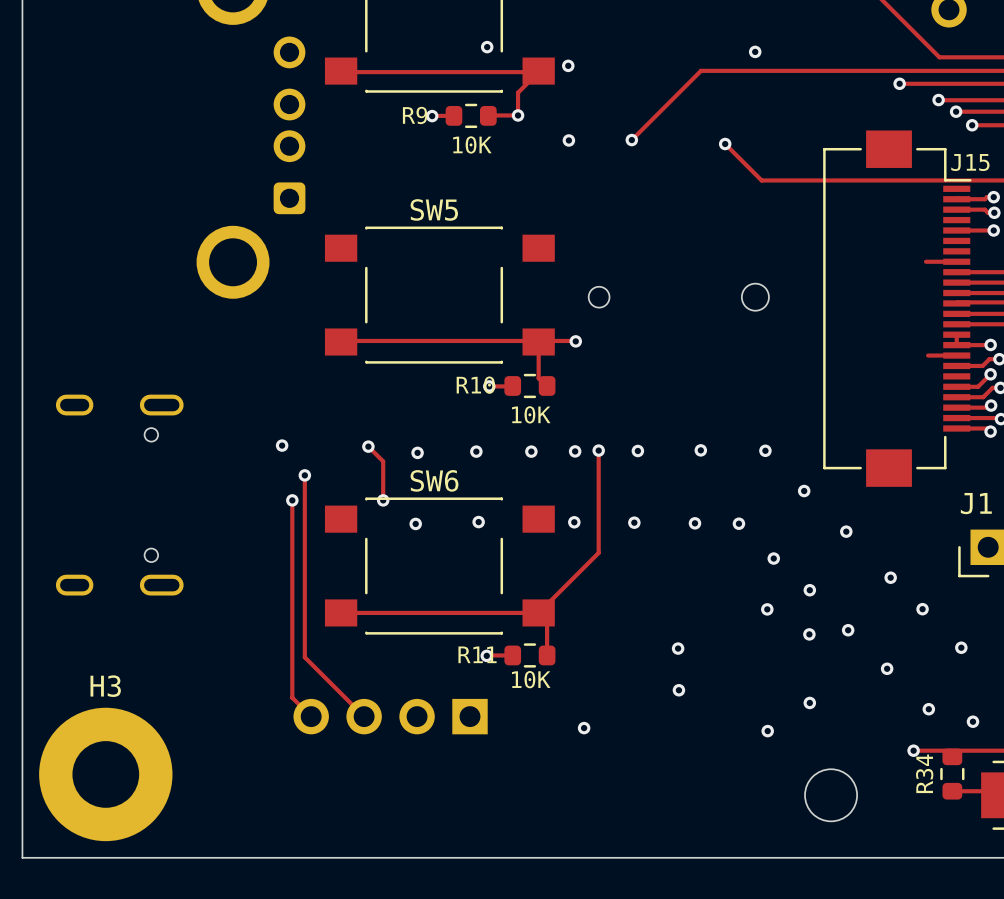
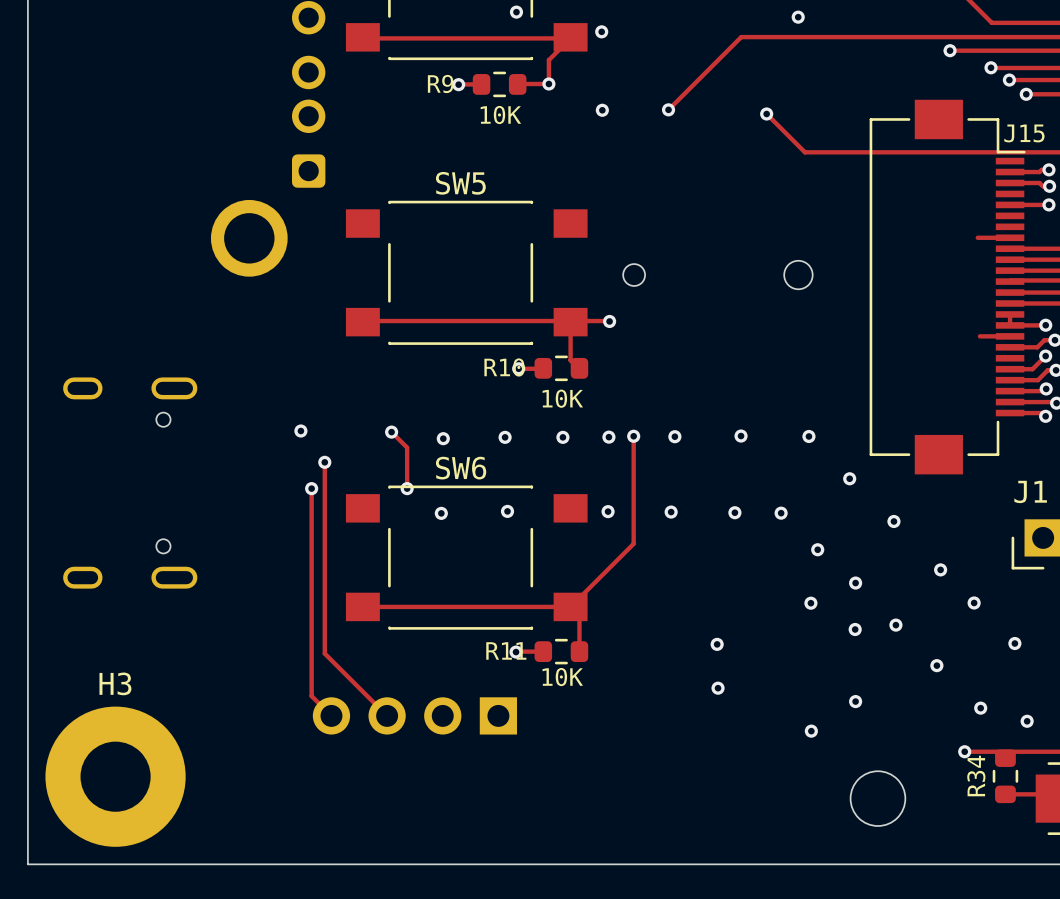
via: (584, 728) -> none

